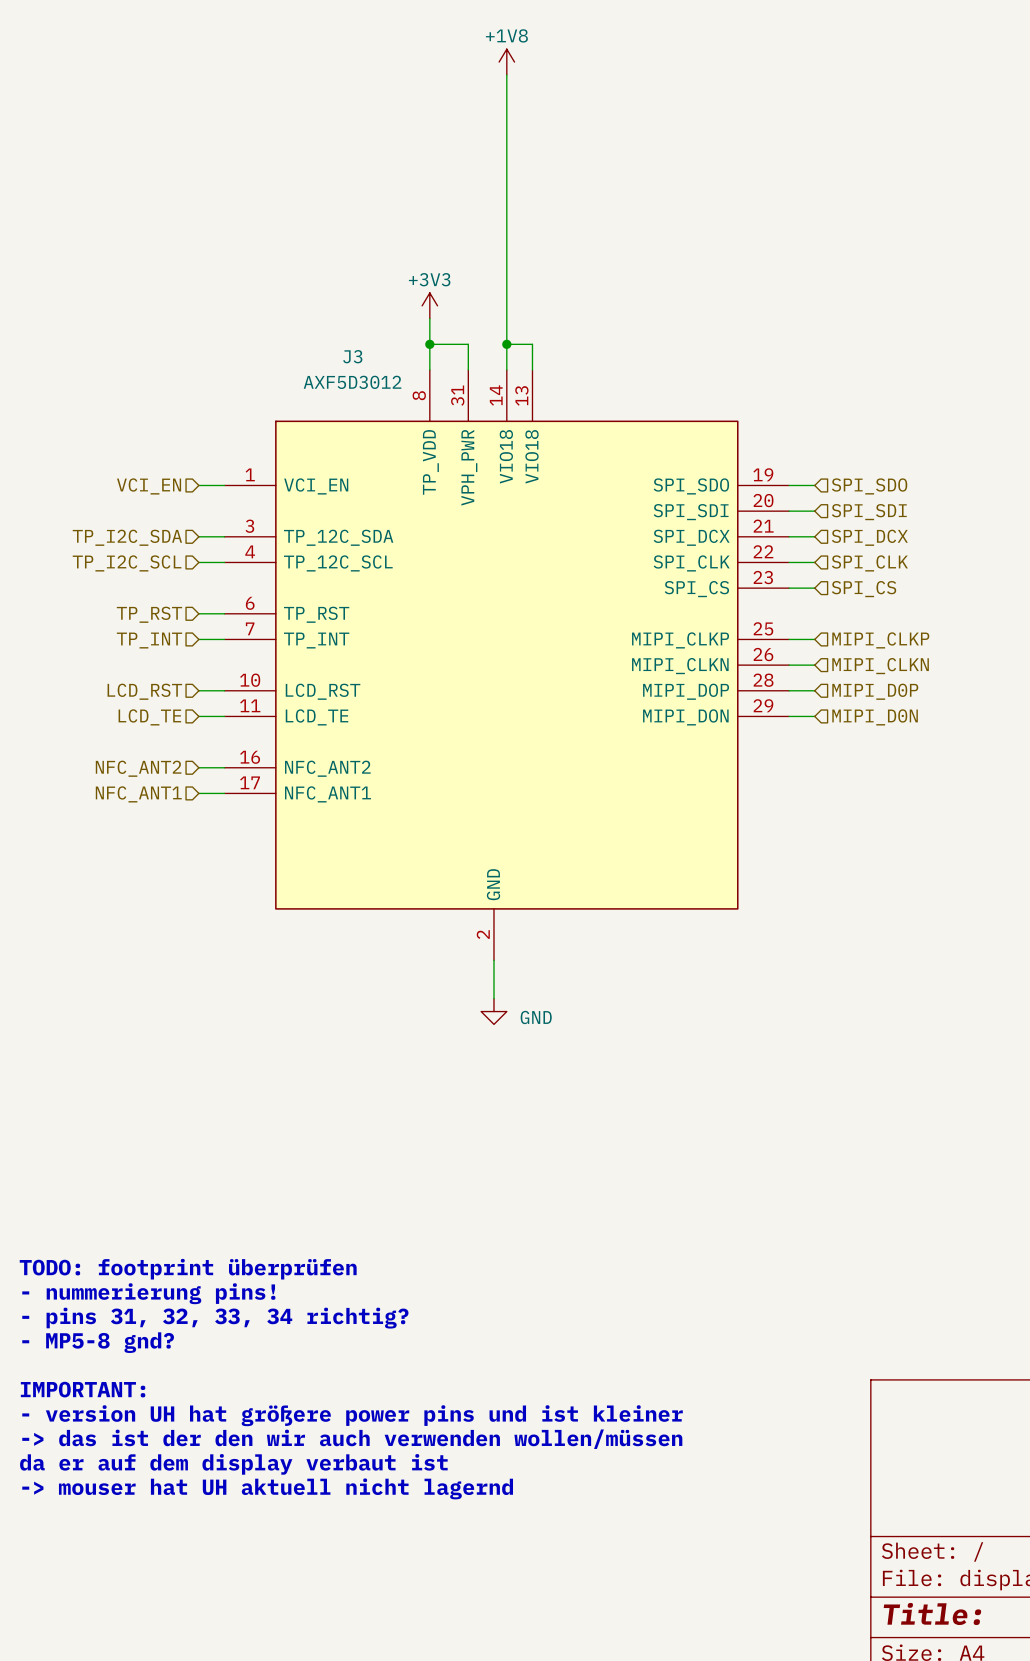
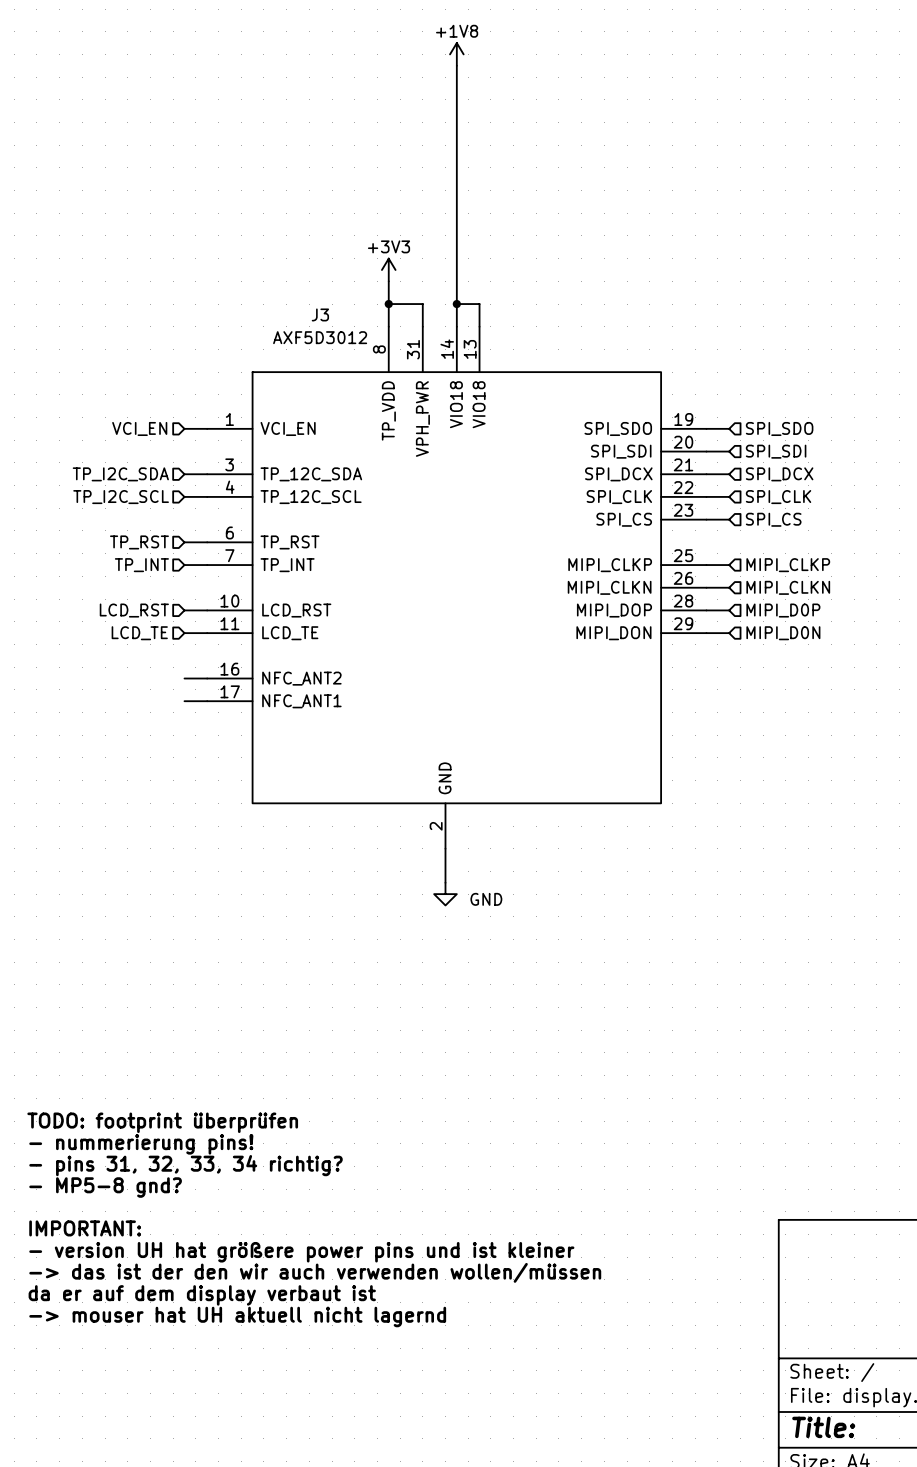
hierarchical label: NFC_ANT2 (138, 768) -> none
hierarchical label: NFC_ANT1 (138, 794) -> none

